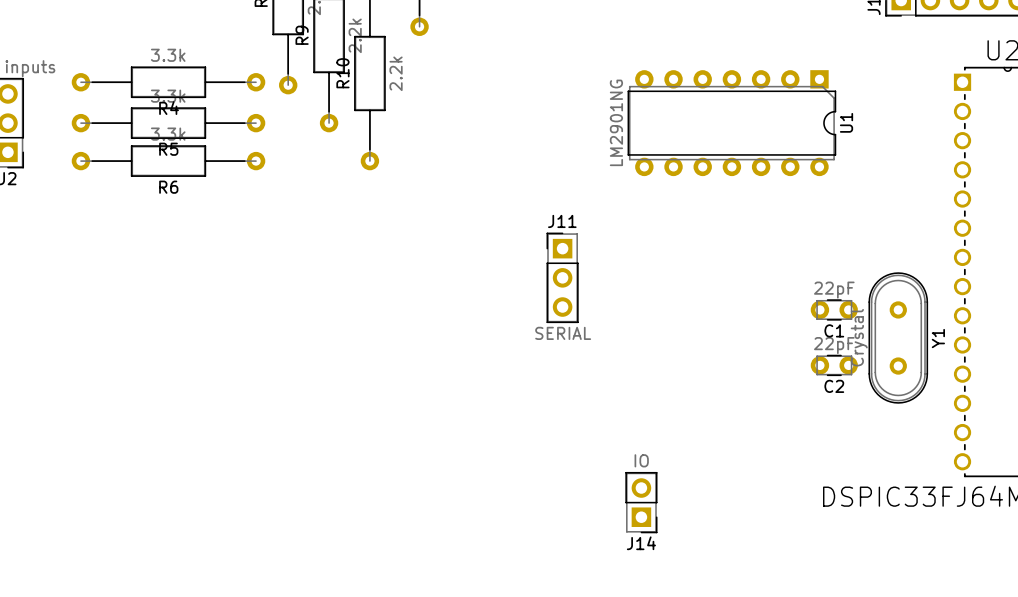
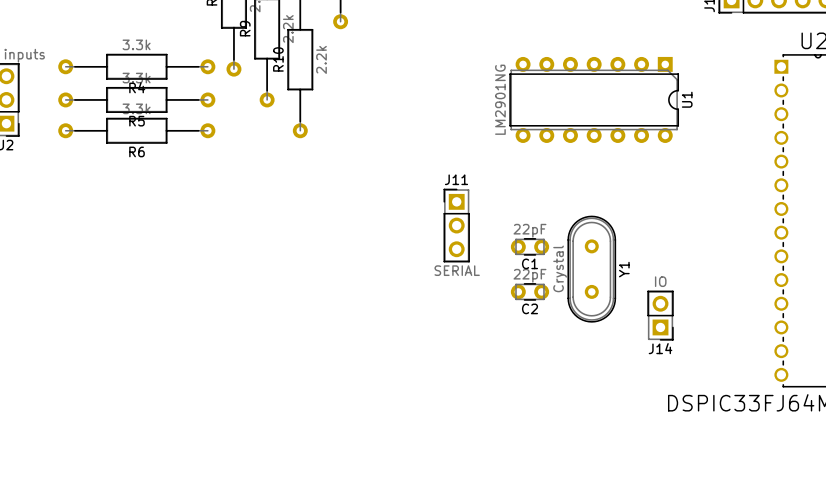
C1 position: (834, 309) -> (529, 246)
Y1 position: (898, 337) -> (591, 269)
C2 position: (834, 365) -> (529, 291)
J14 position: (641, 502) -> (660, 315)

